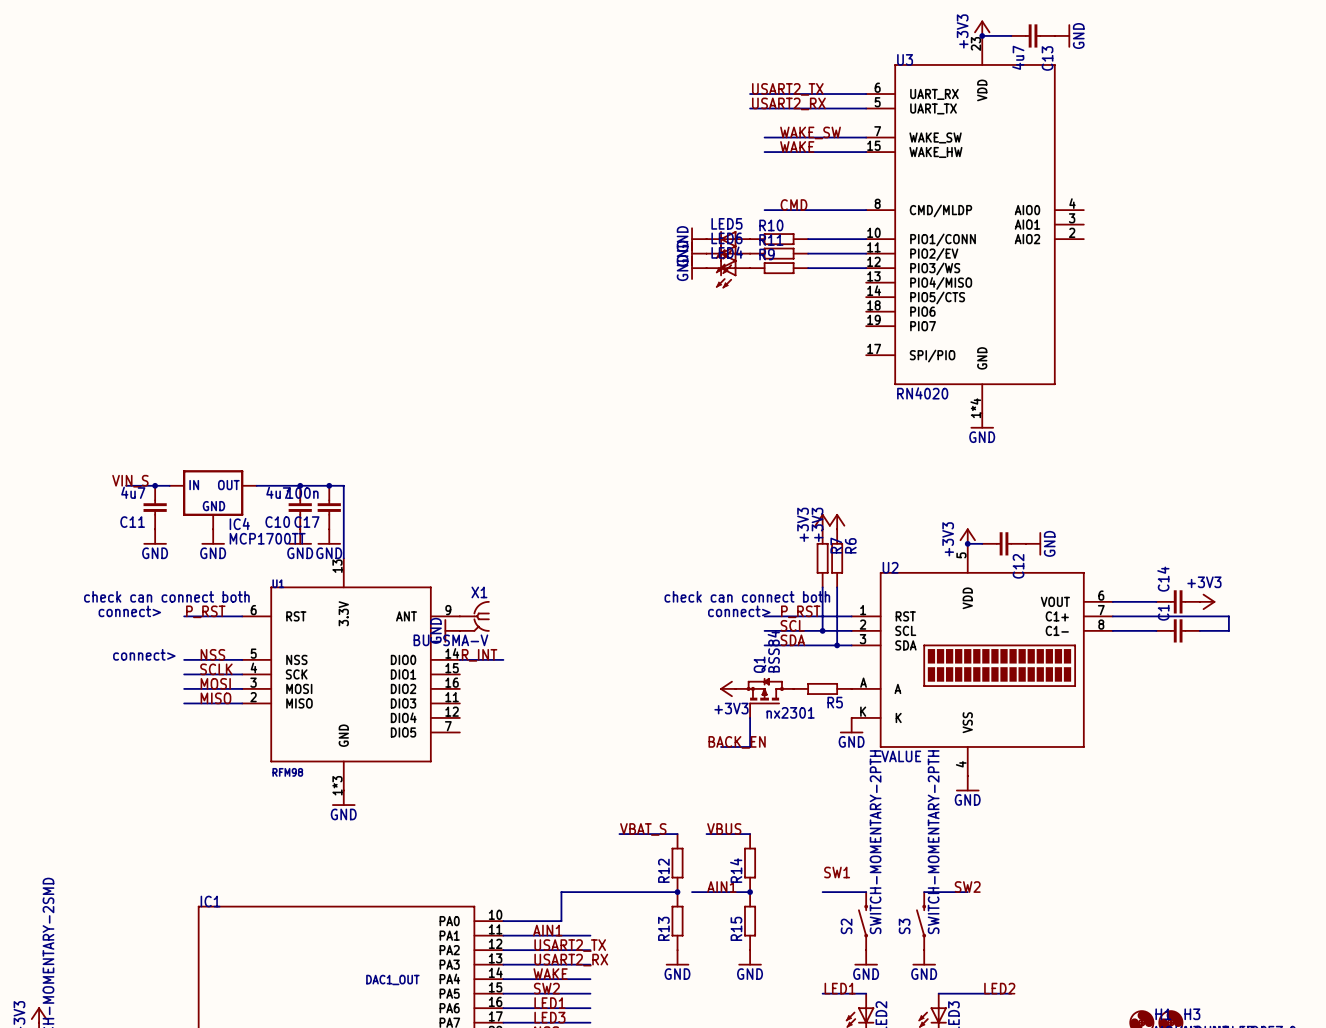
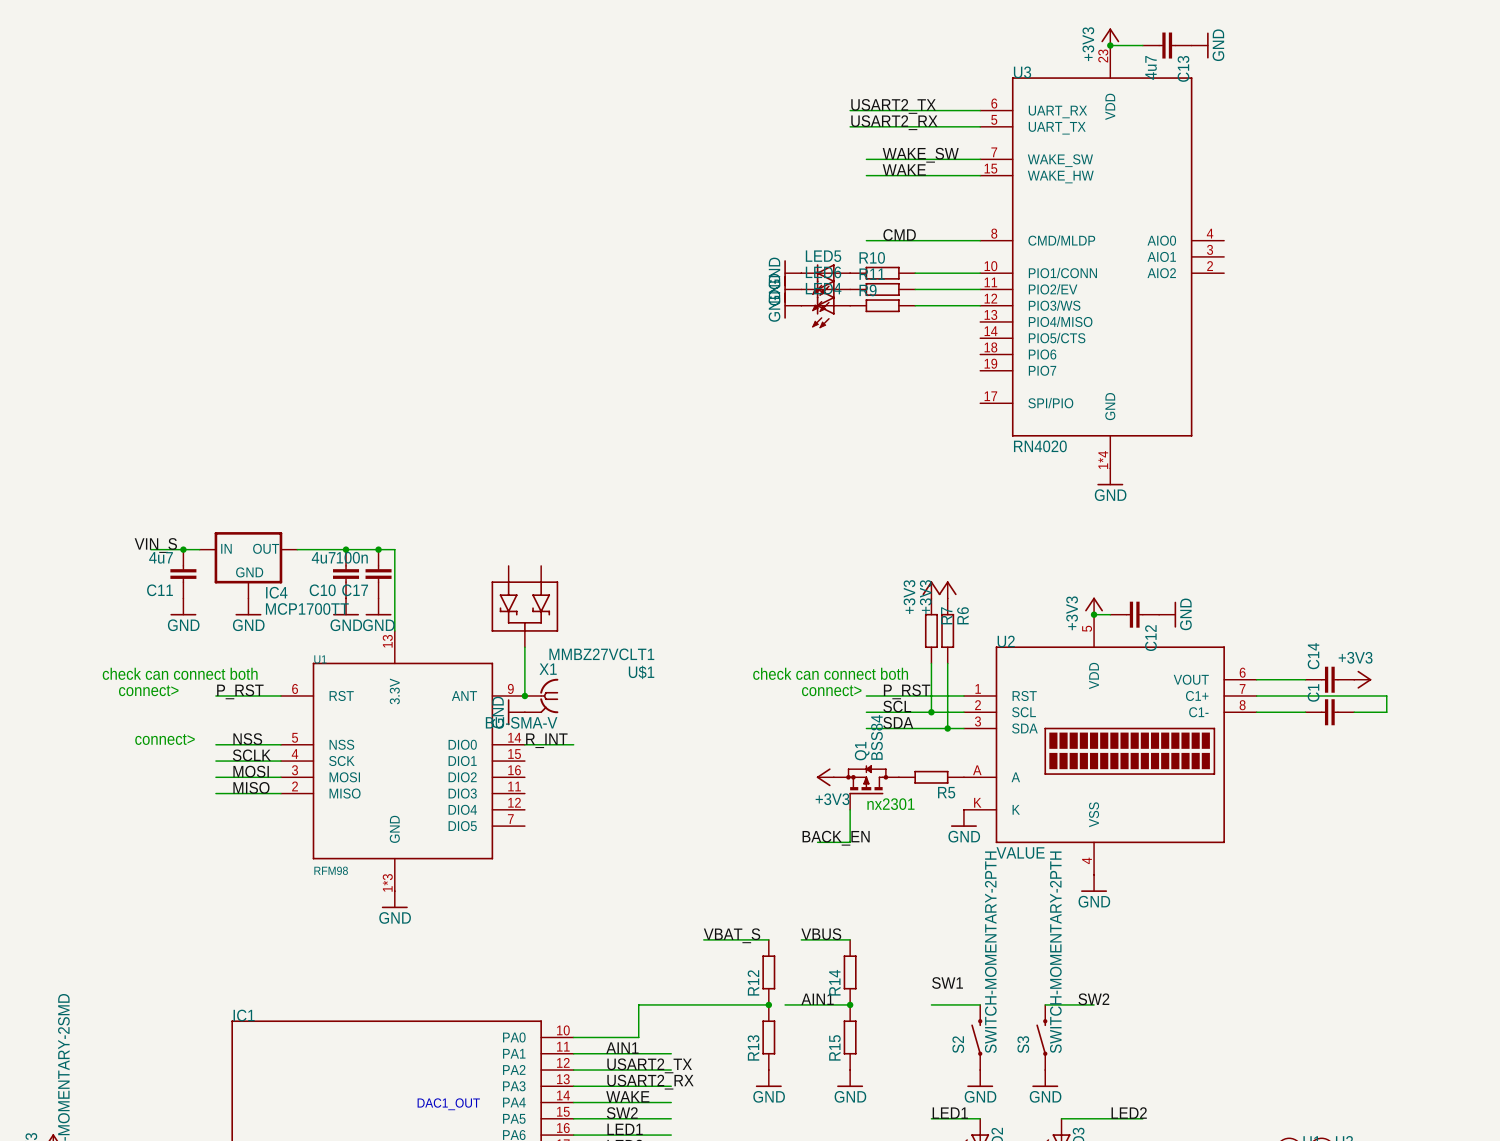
U$1: none -> MMBZ27VCLT1 (524, 606)
wire: none -> (524, 647) (524, 695)
junction: none -> (524, 695)

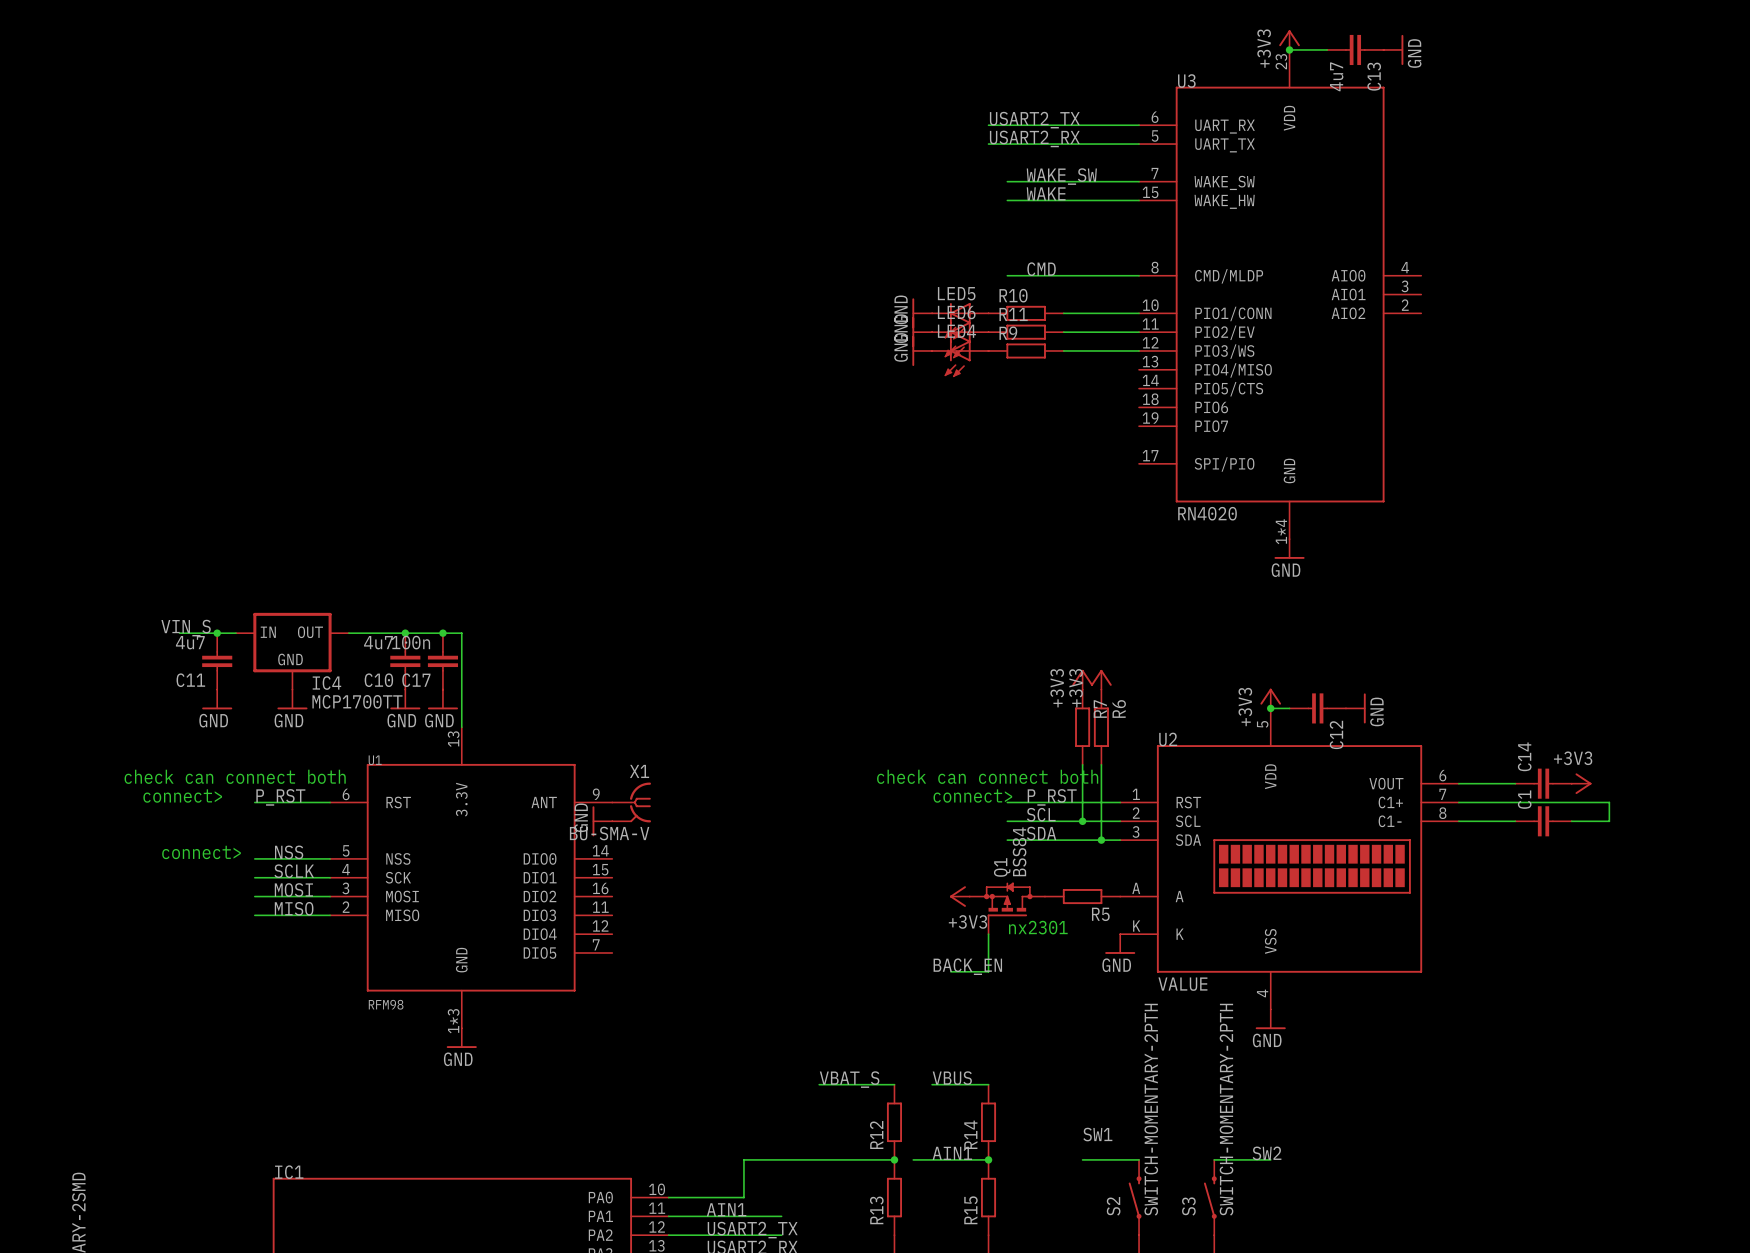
U$1: MMBZ27VCLT1 (524, 606) -> none
wire: (524, 647) (524, 695) -> none
junction: (524, 695) -> none
label: R_INT (546, 740) -> none
wire: (524, 744) (573, 744) -> none

